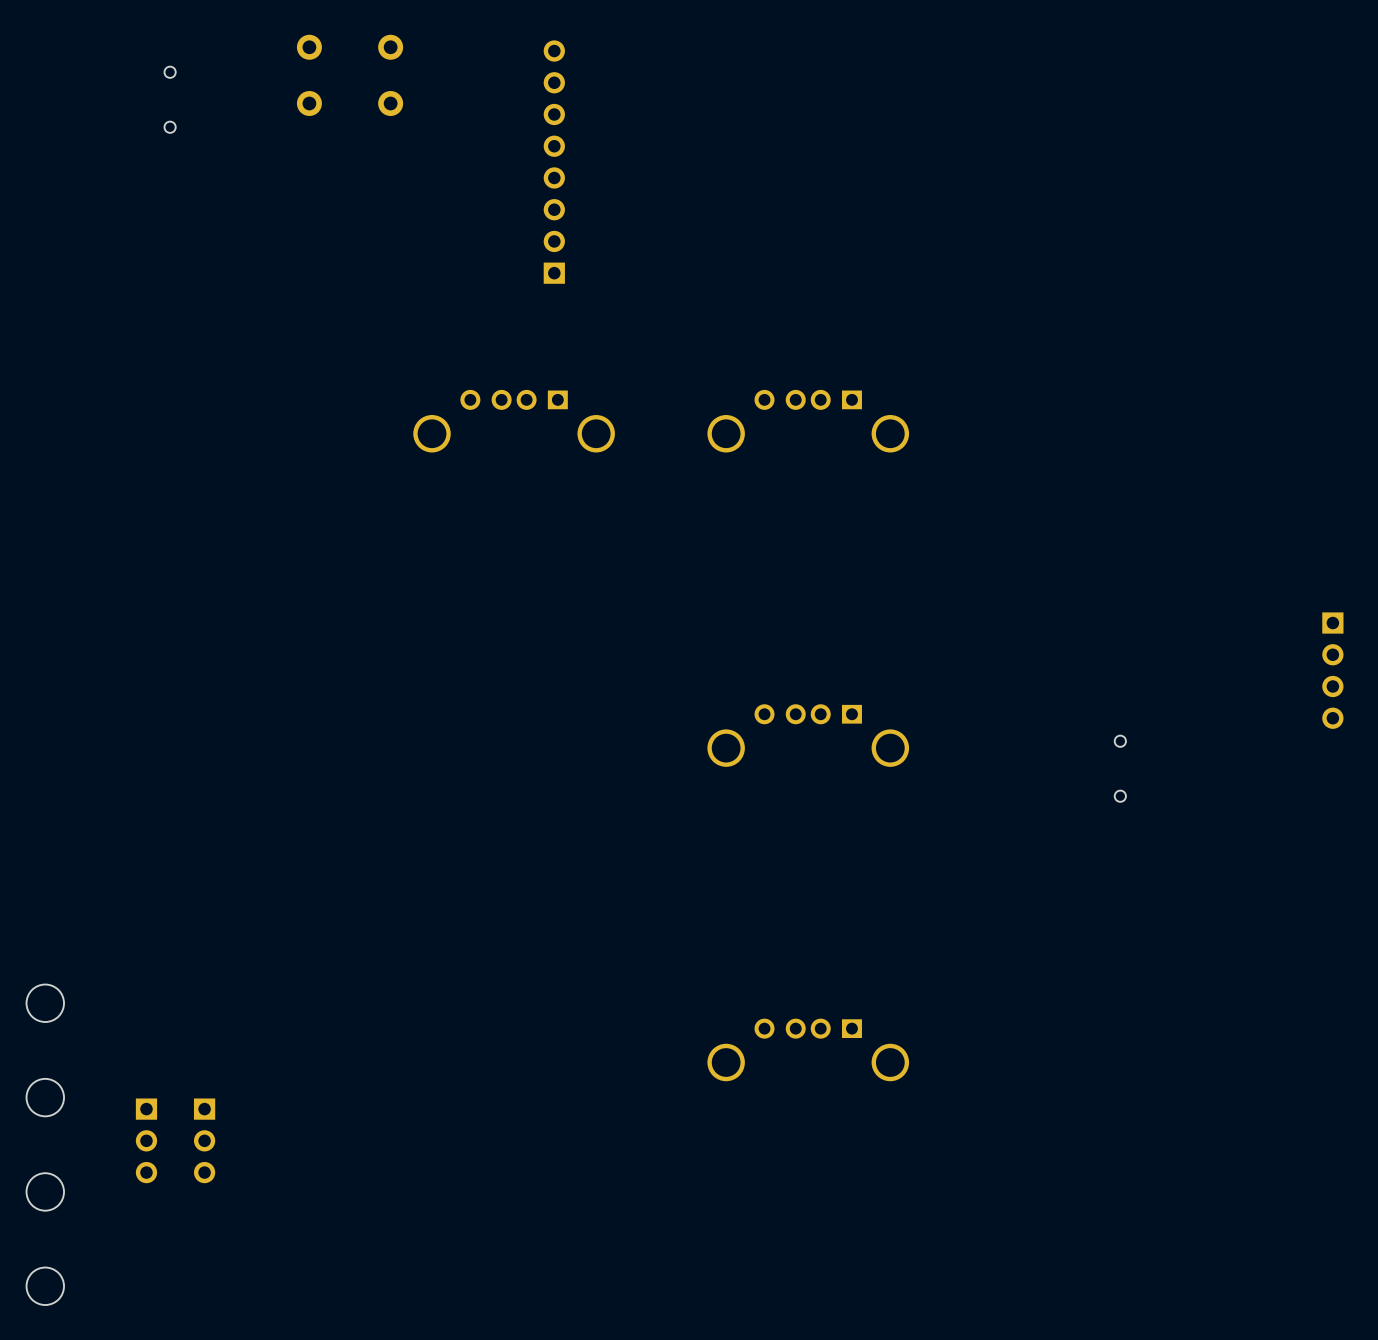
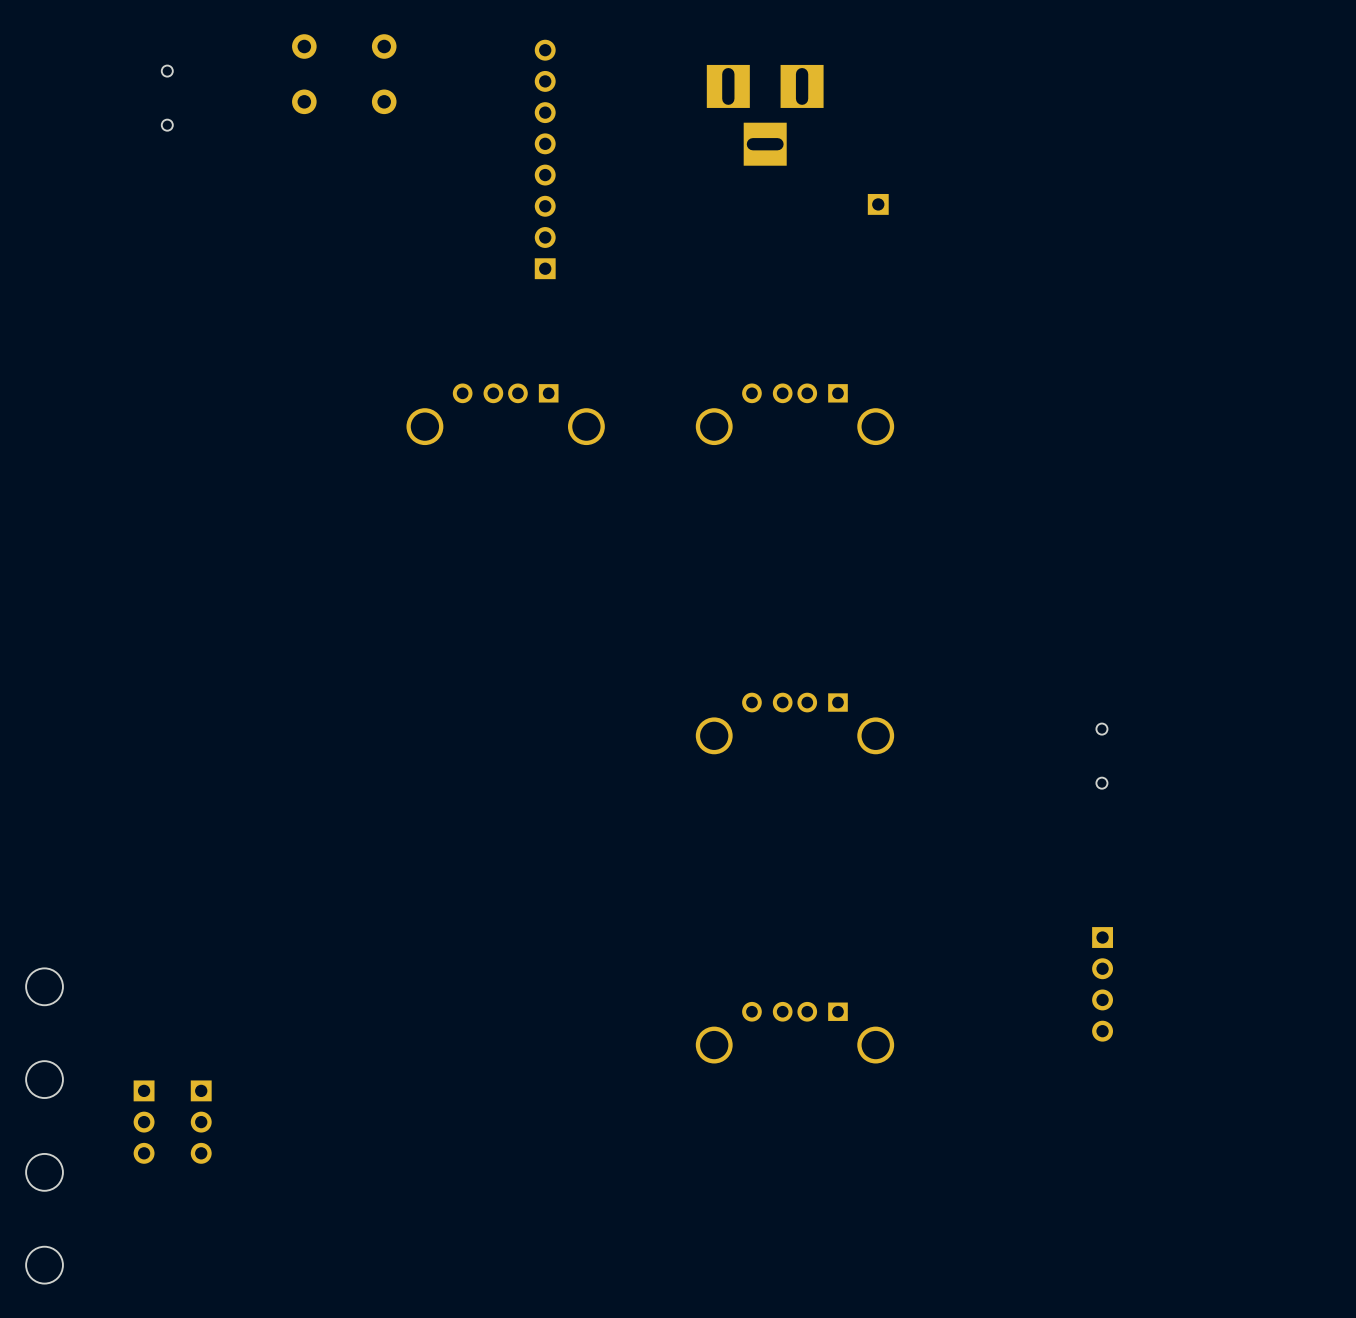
part: none -> (765, 115)
part: none -> (878, 204)
part: (1332, 670) -> none
part: none -> (1102, 984)

